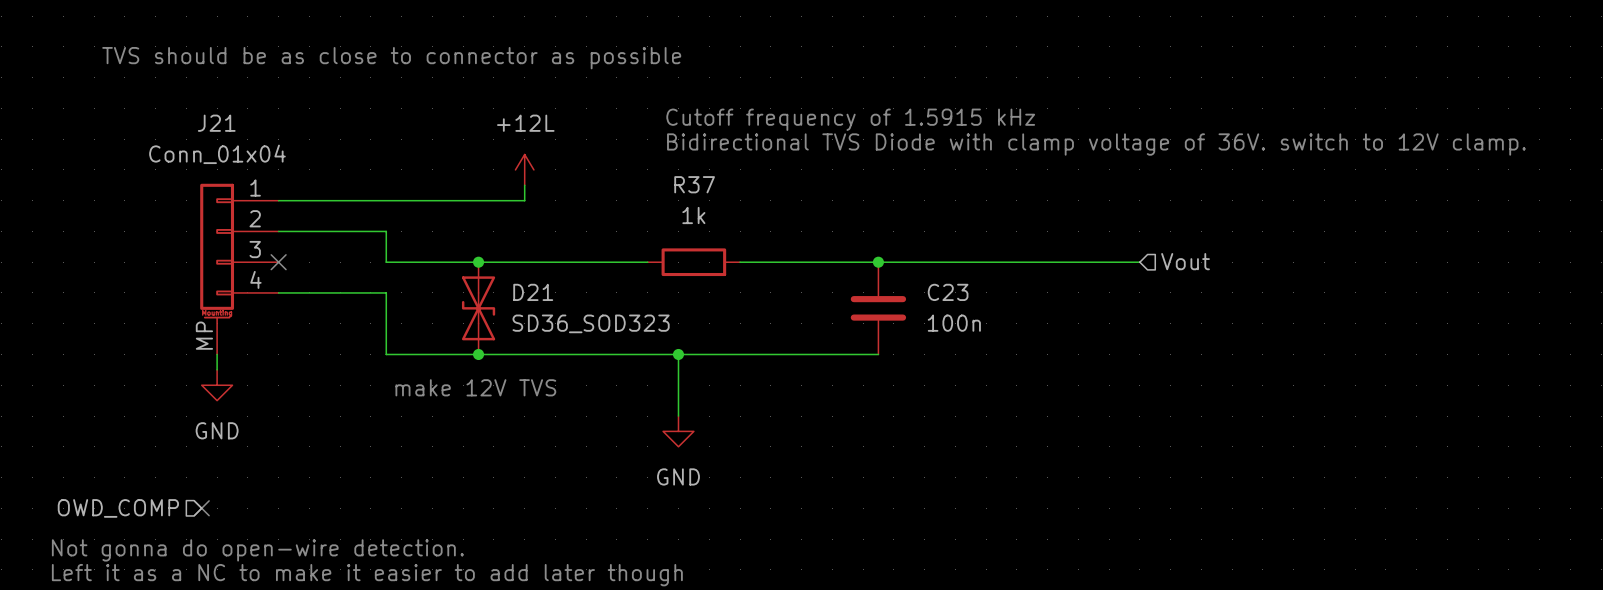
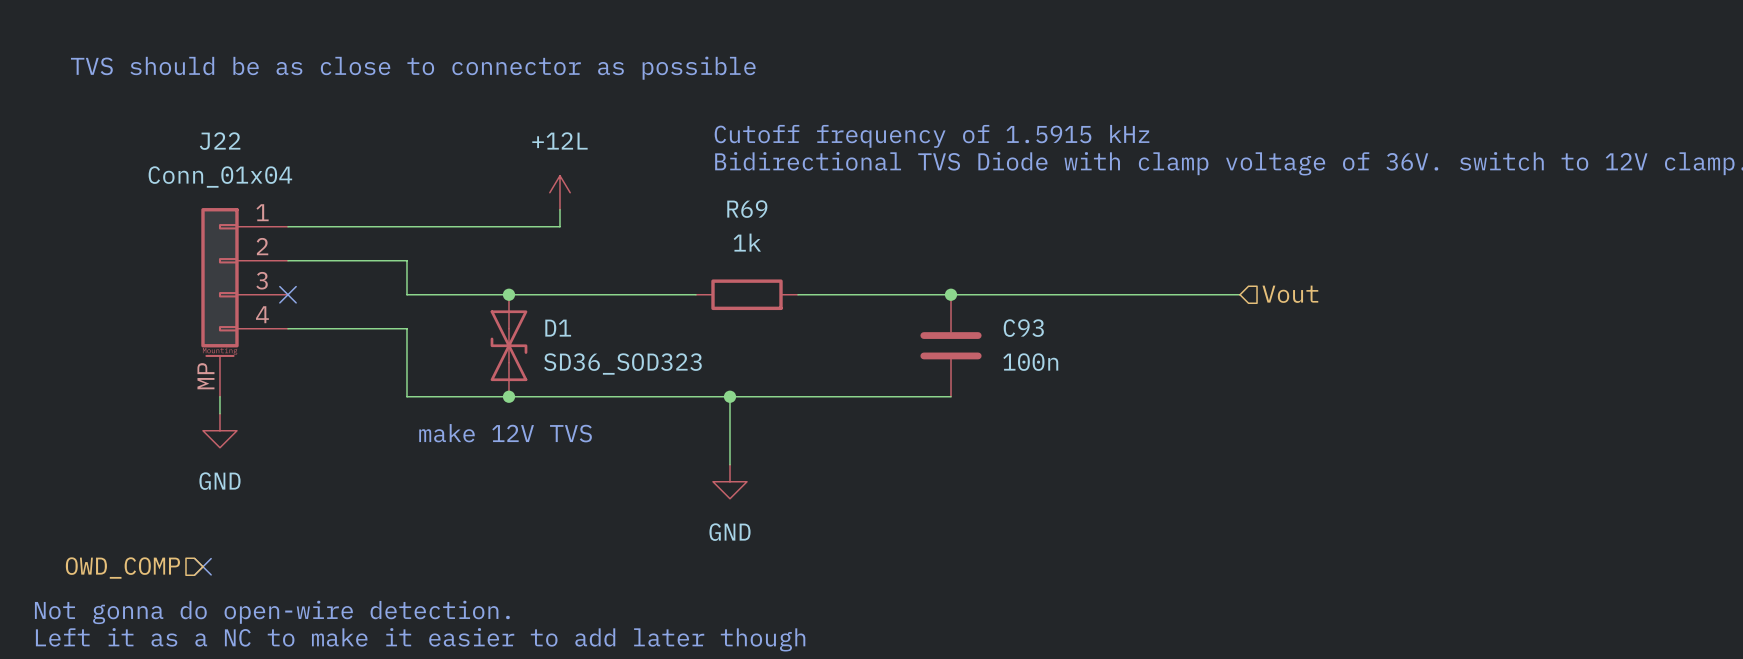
J21 name: J21 (216, 123) -> J22 (220, 141)
R37 name: R37 (694, 184) -> R69 (747, 209)
D21 name: D21 (533, 292) -> D1 (558, 328)
C23 name: C23 (948, 292) -> C93 (1023, 328)

